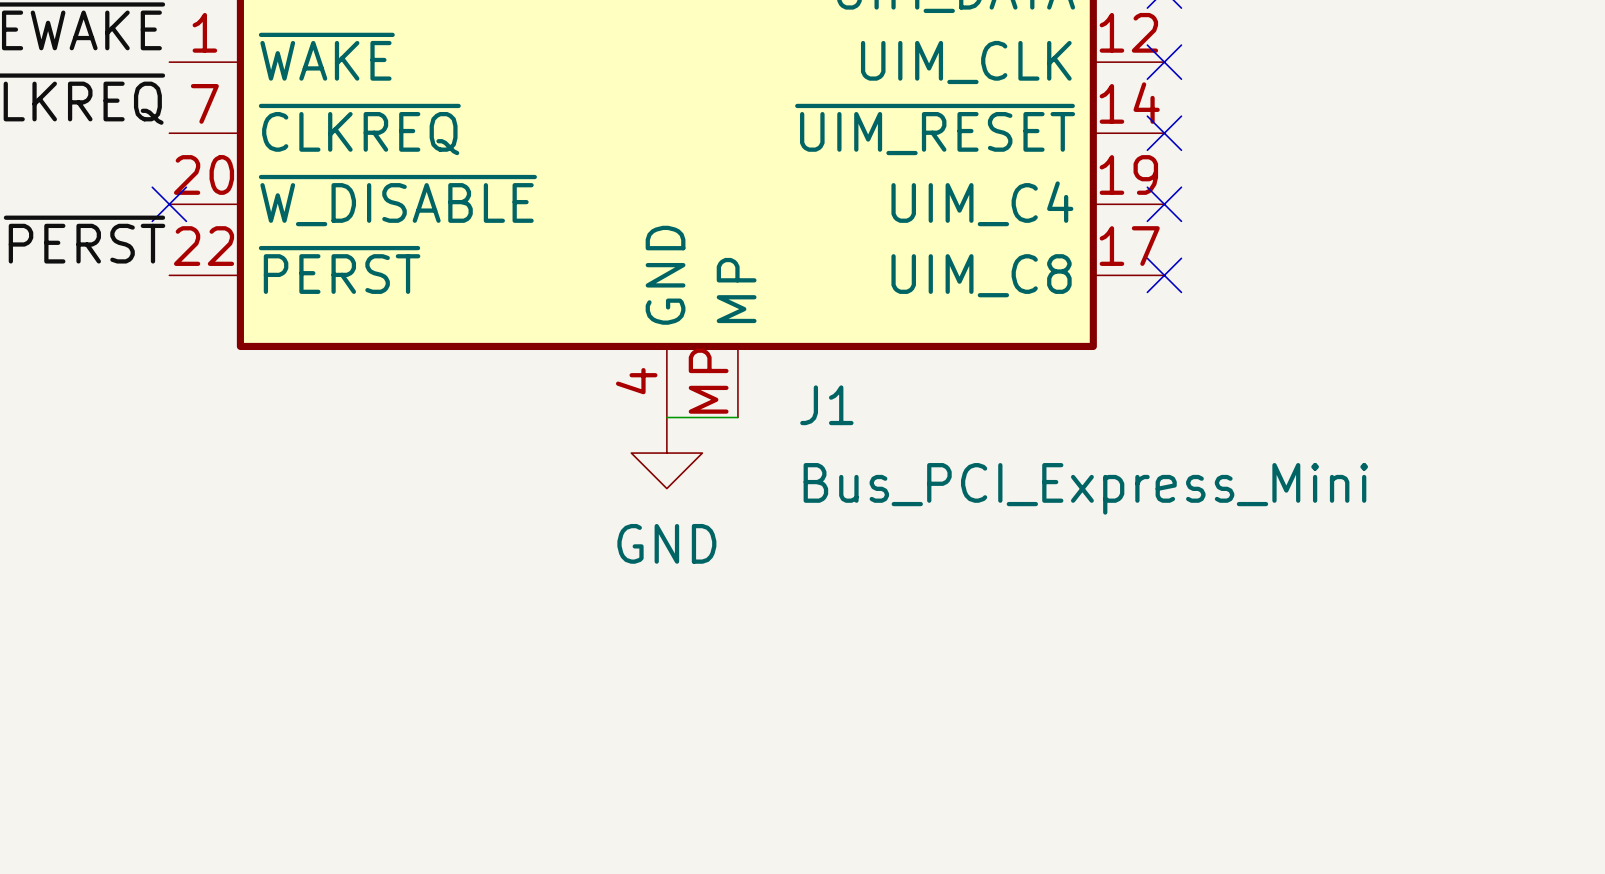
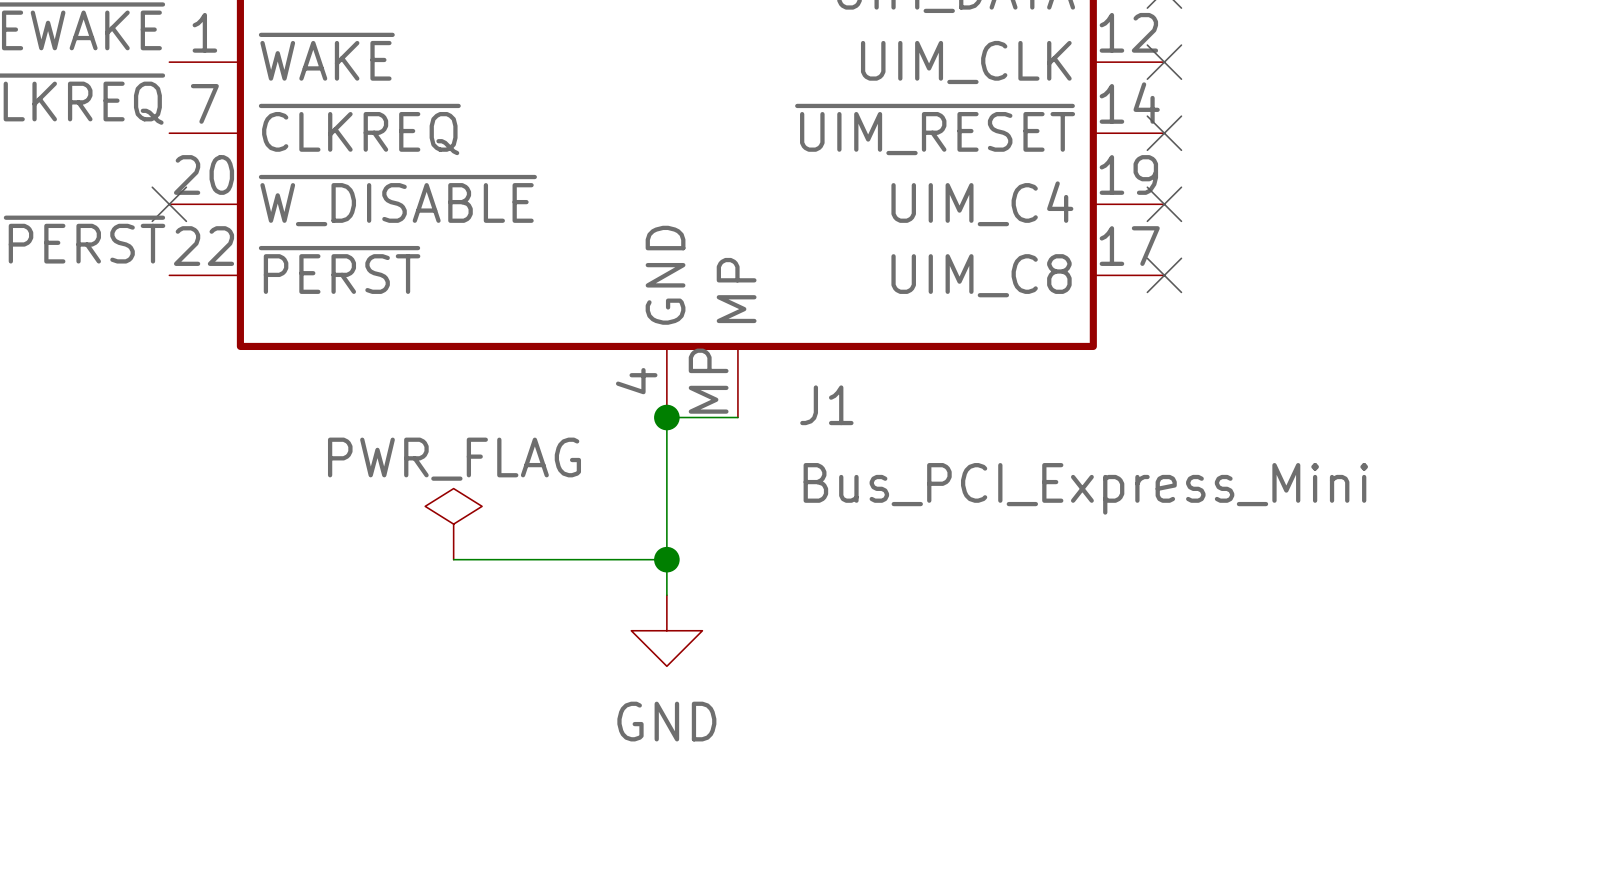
wire: none -> (666, 417) (666, 595)
junction: none -> (666, 417)
power symbol position: GND (666, 453) -> GND (666, 630)
power symbol: none -> PWR_FLAG (453, 524)
wire: none -> (453, 559) (666, 559)
junction: none -> (666, 559)

